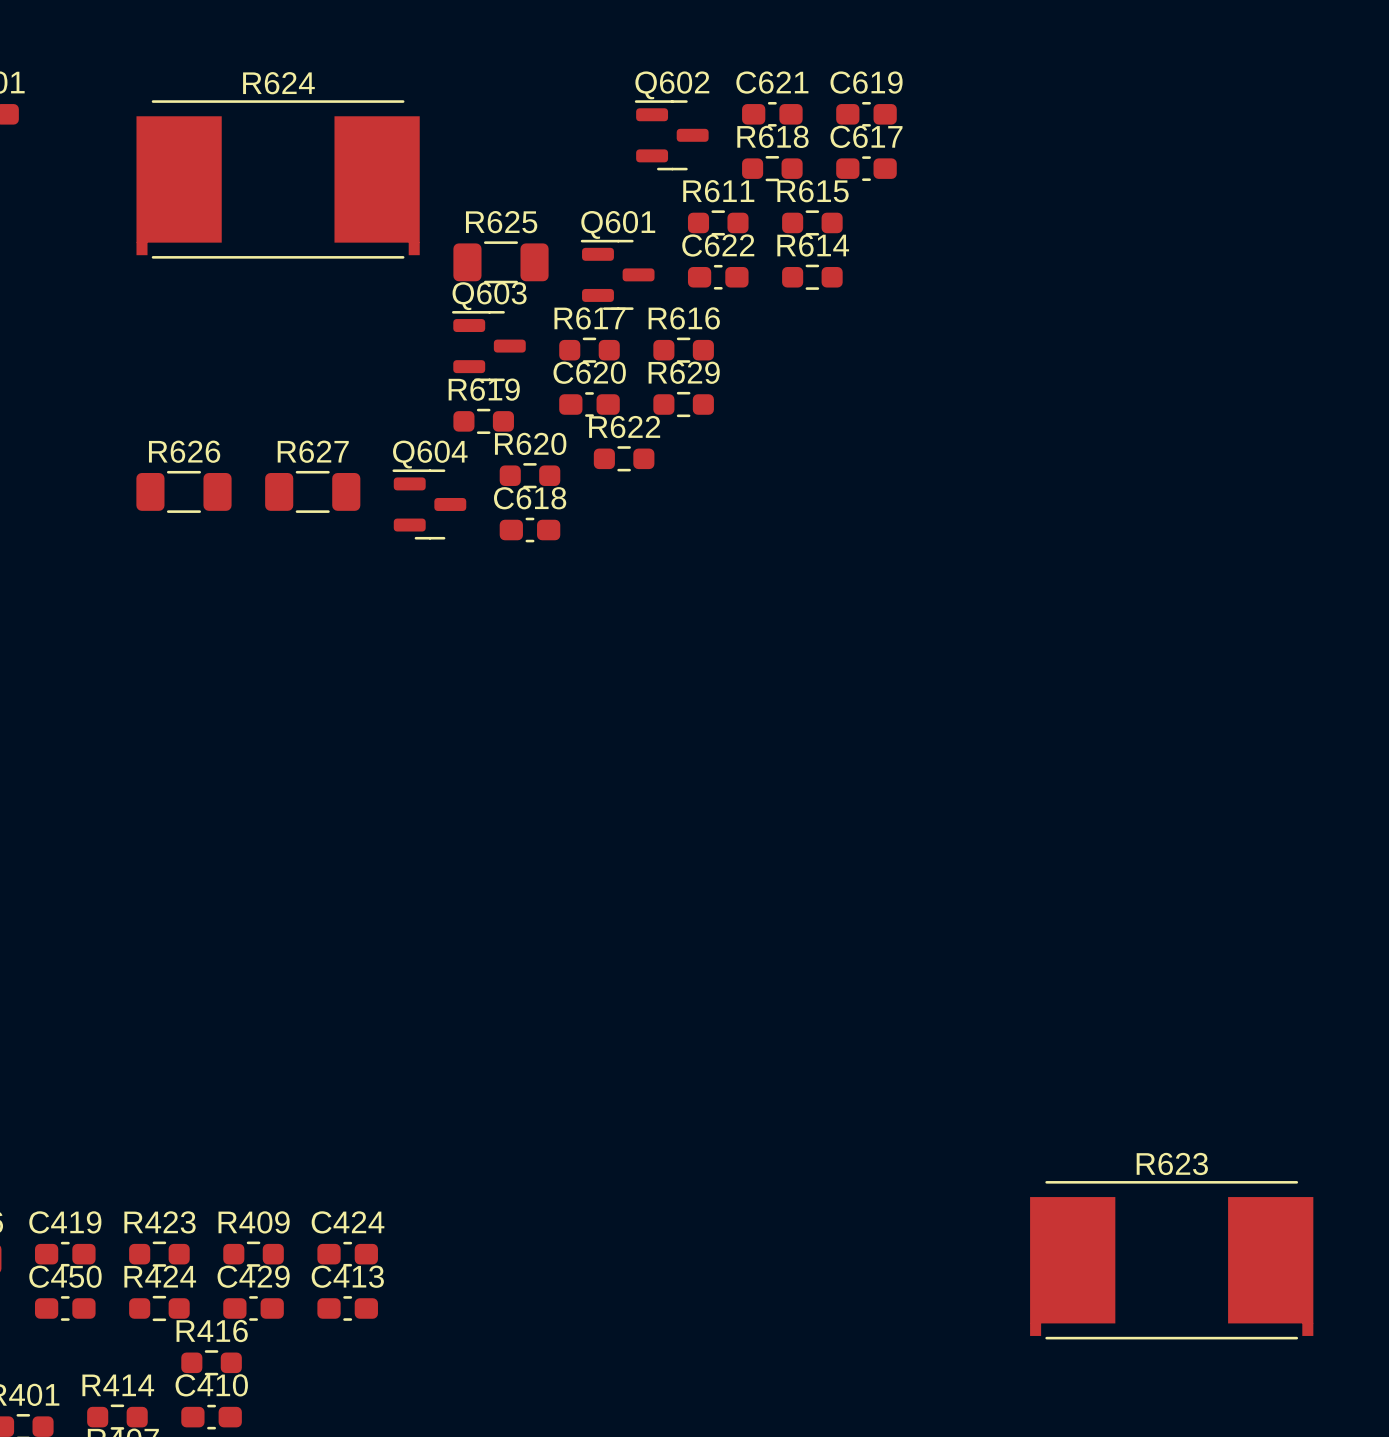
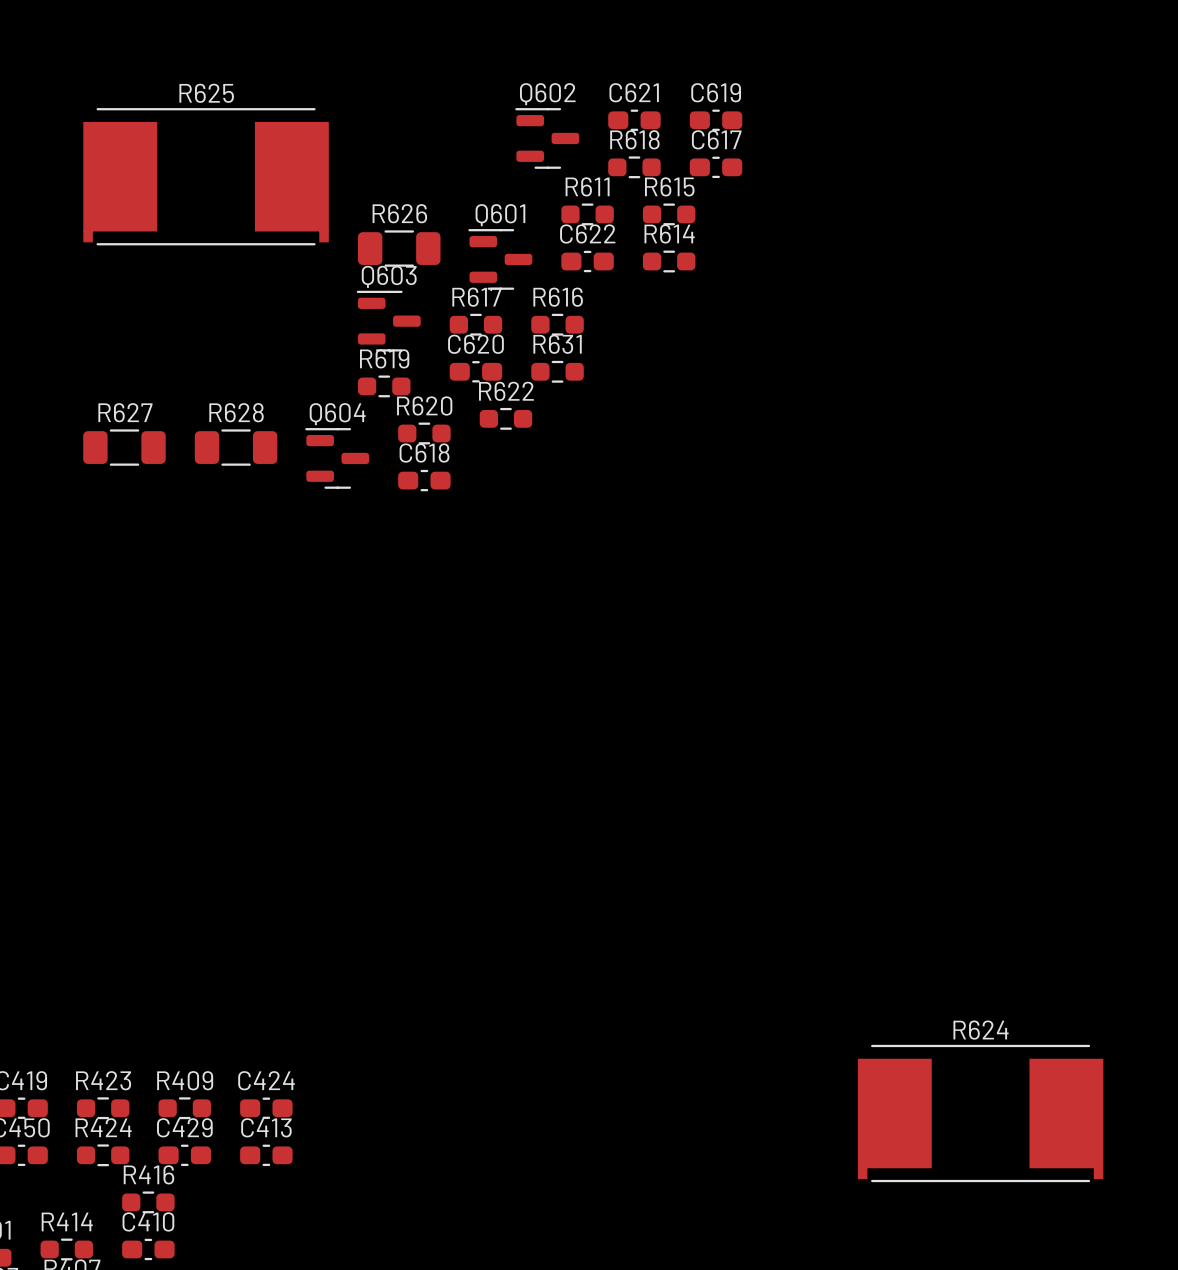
R624 name: R624 (278, 83) -> R625 (206, 93)
R625 name: R625 (501, 222) -> R626 (399, 213)
R629 name: R629 (684, 372) -> R631 (557, 344)
R626 name: R626 (184, 451) -> R627 (125, 412)
R627 name: R627 (313, 451) -> R628 (236, 412)
R623 name: R623 (1172, 1163) -> R624 (981, 1030)

